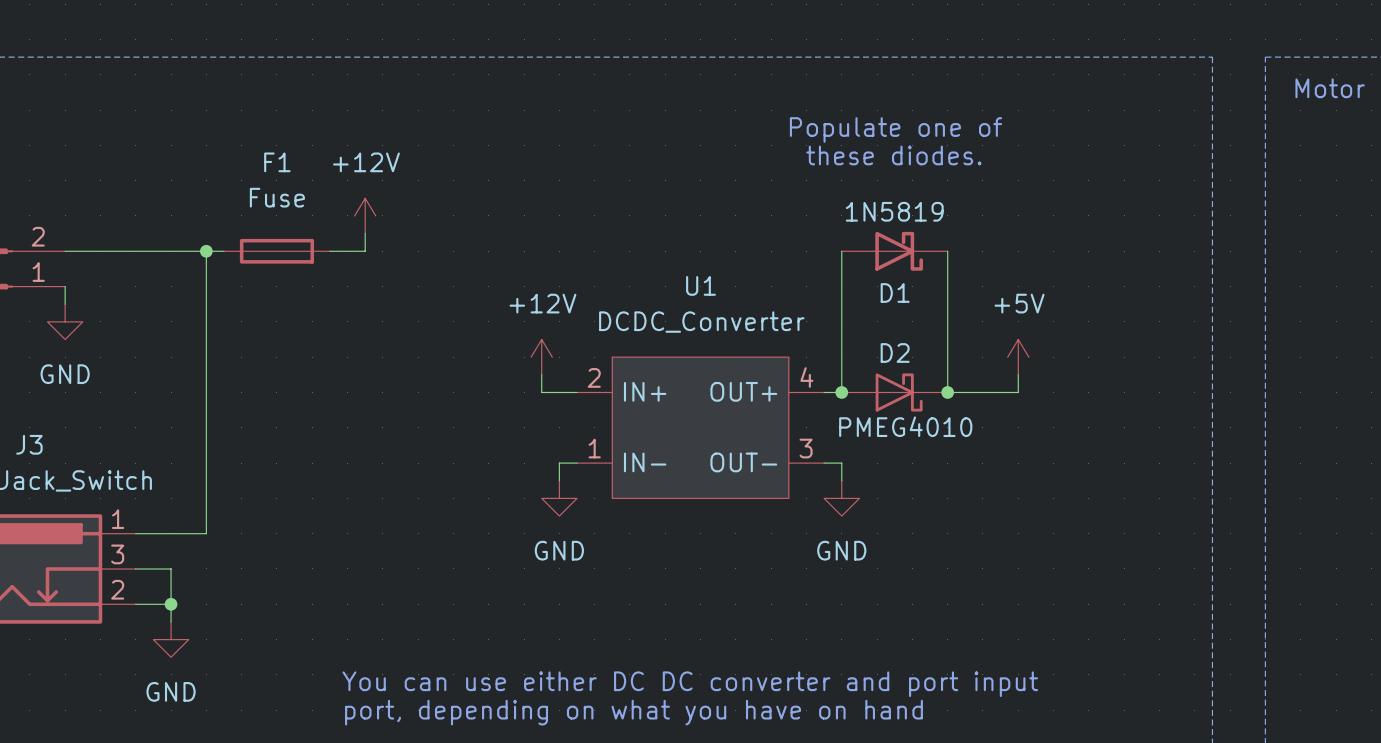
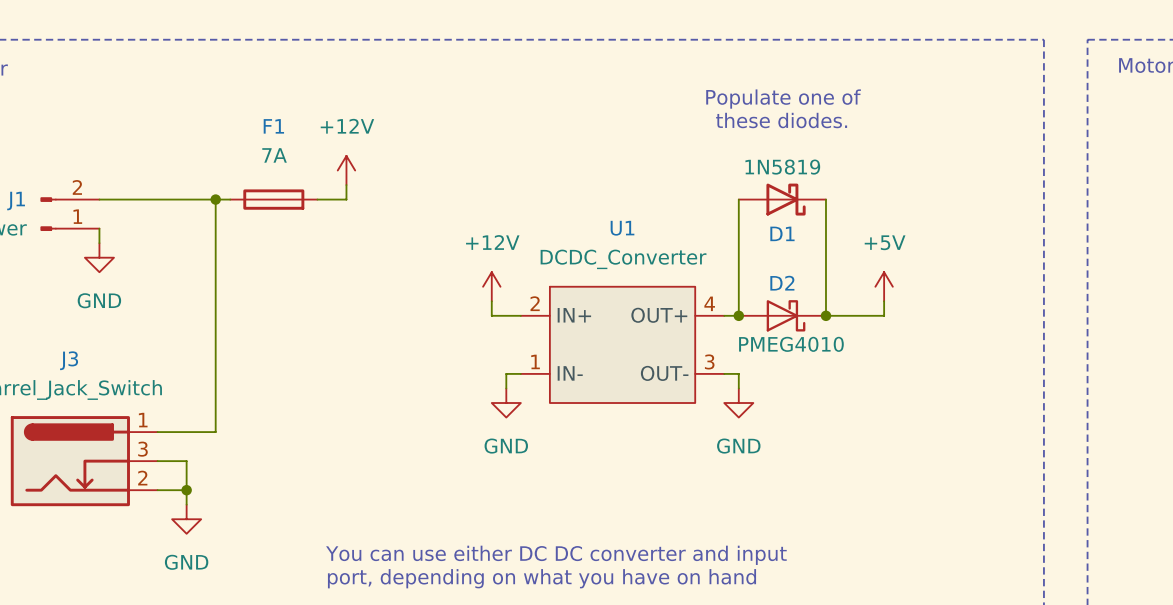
F1 value: Fuse (277, 197) -> 7A (274, 155)
text: You can use either DC DC converter and port input (690, 684) -> You can use either DC DC converter and input (556, 555)

